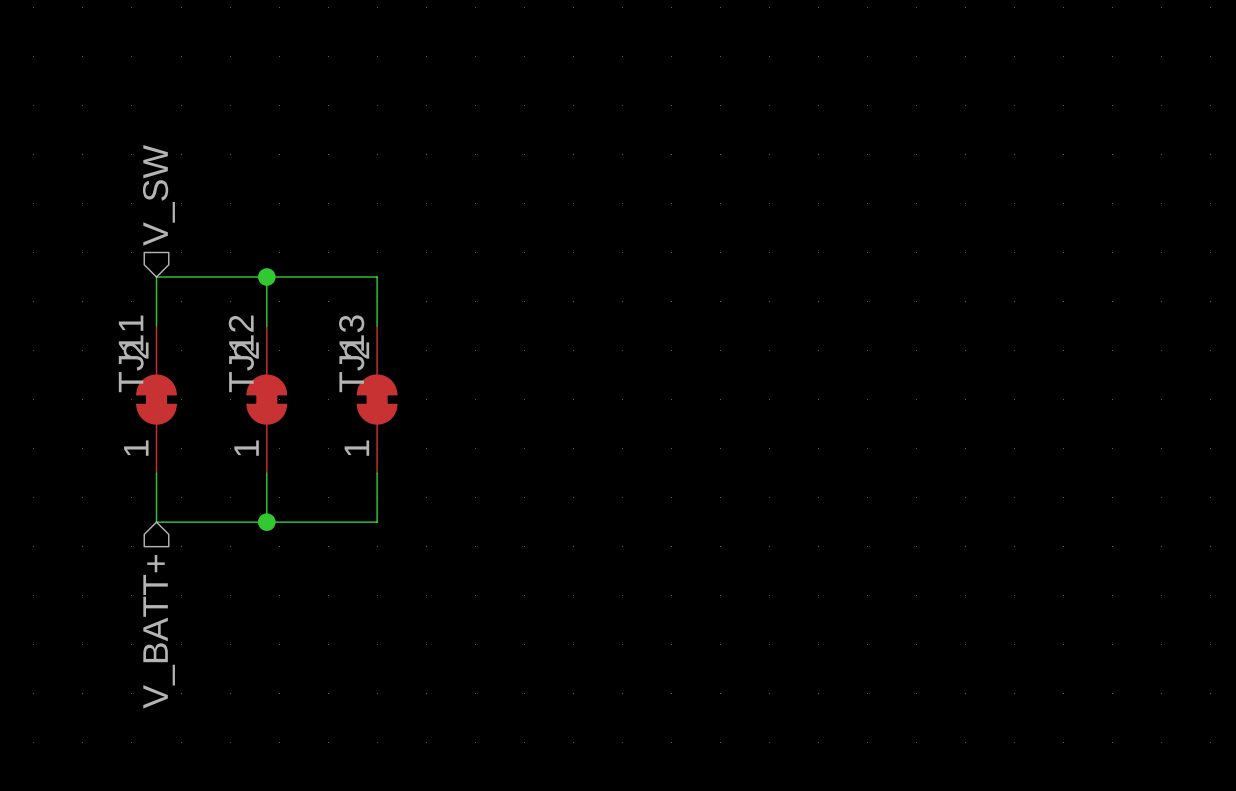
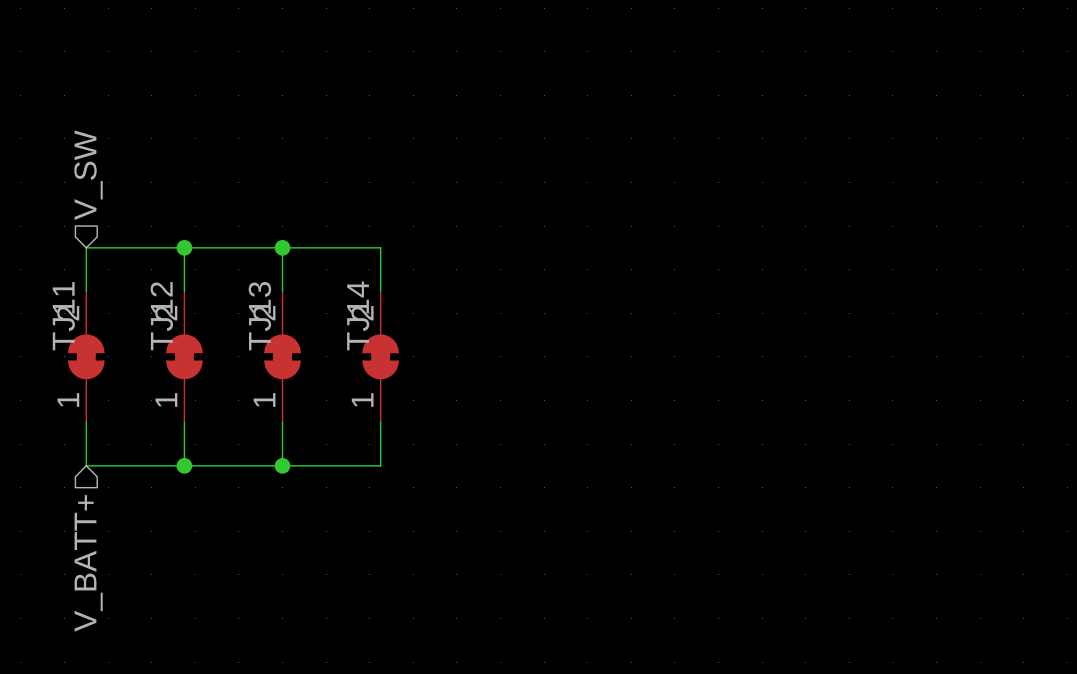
wire: none -> (282, 247) (380, 247) (380, 291)
junction: none -> (282, 247)
TJ14: none -> (380, 356)
wire: none -> (380, 422) (380, 465) (282, 465)
junction: none -> (282, 465)

